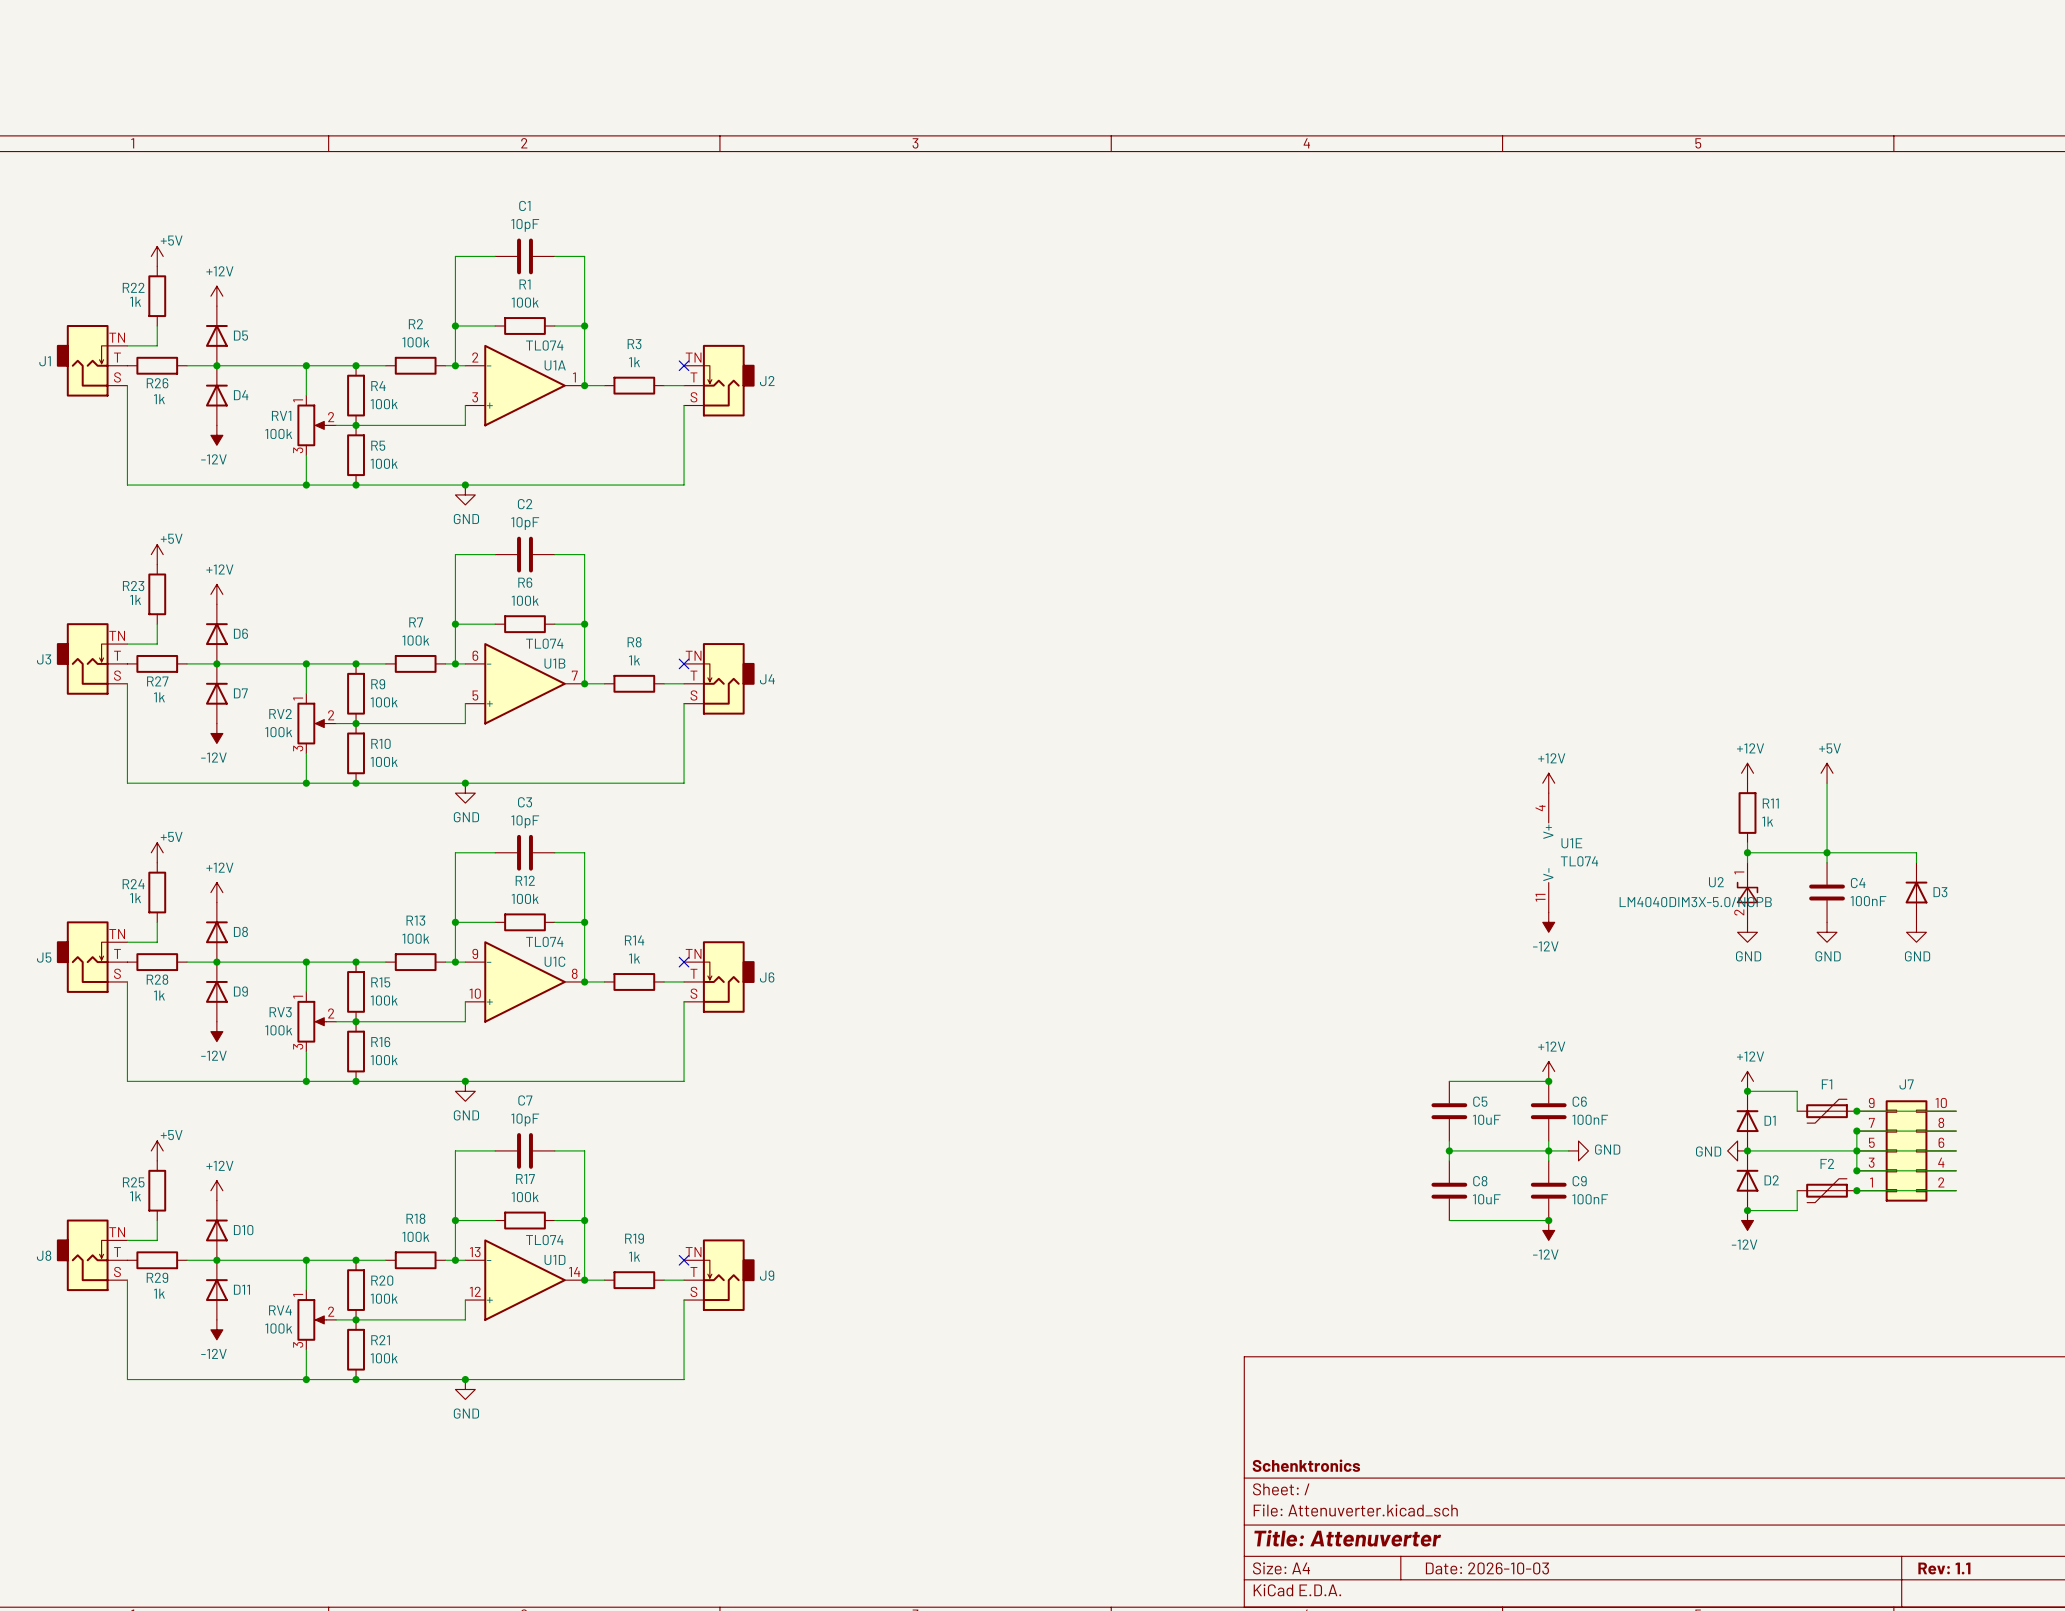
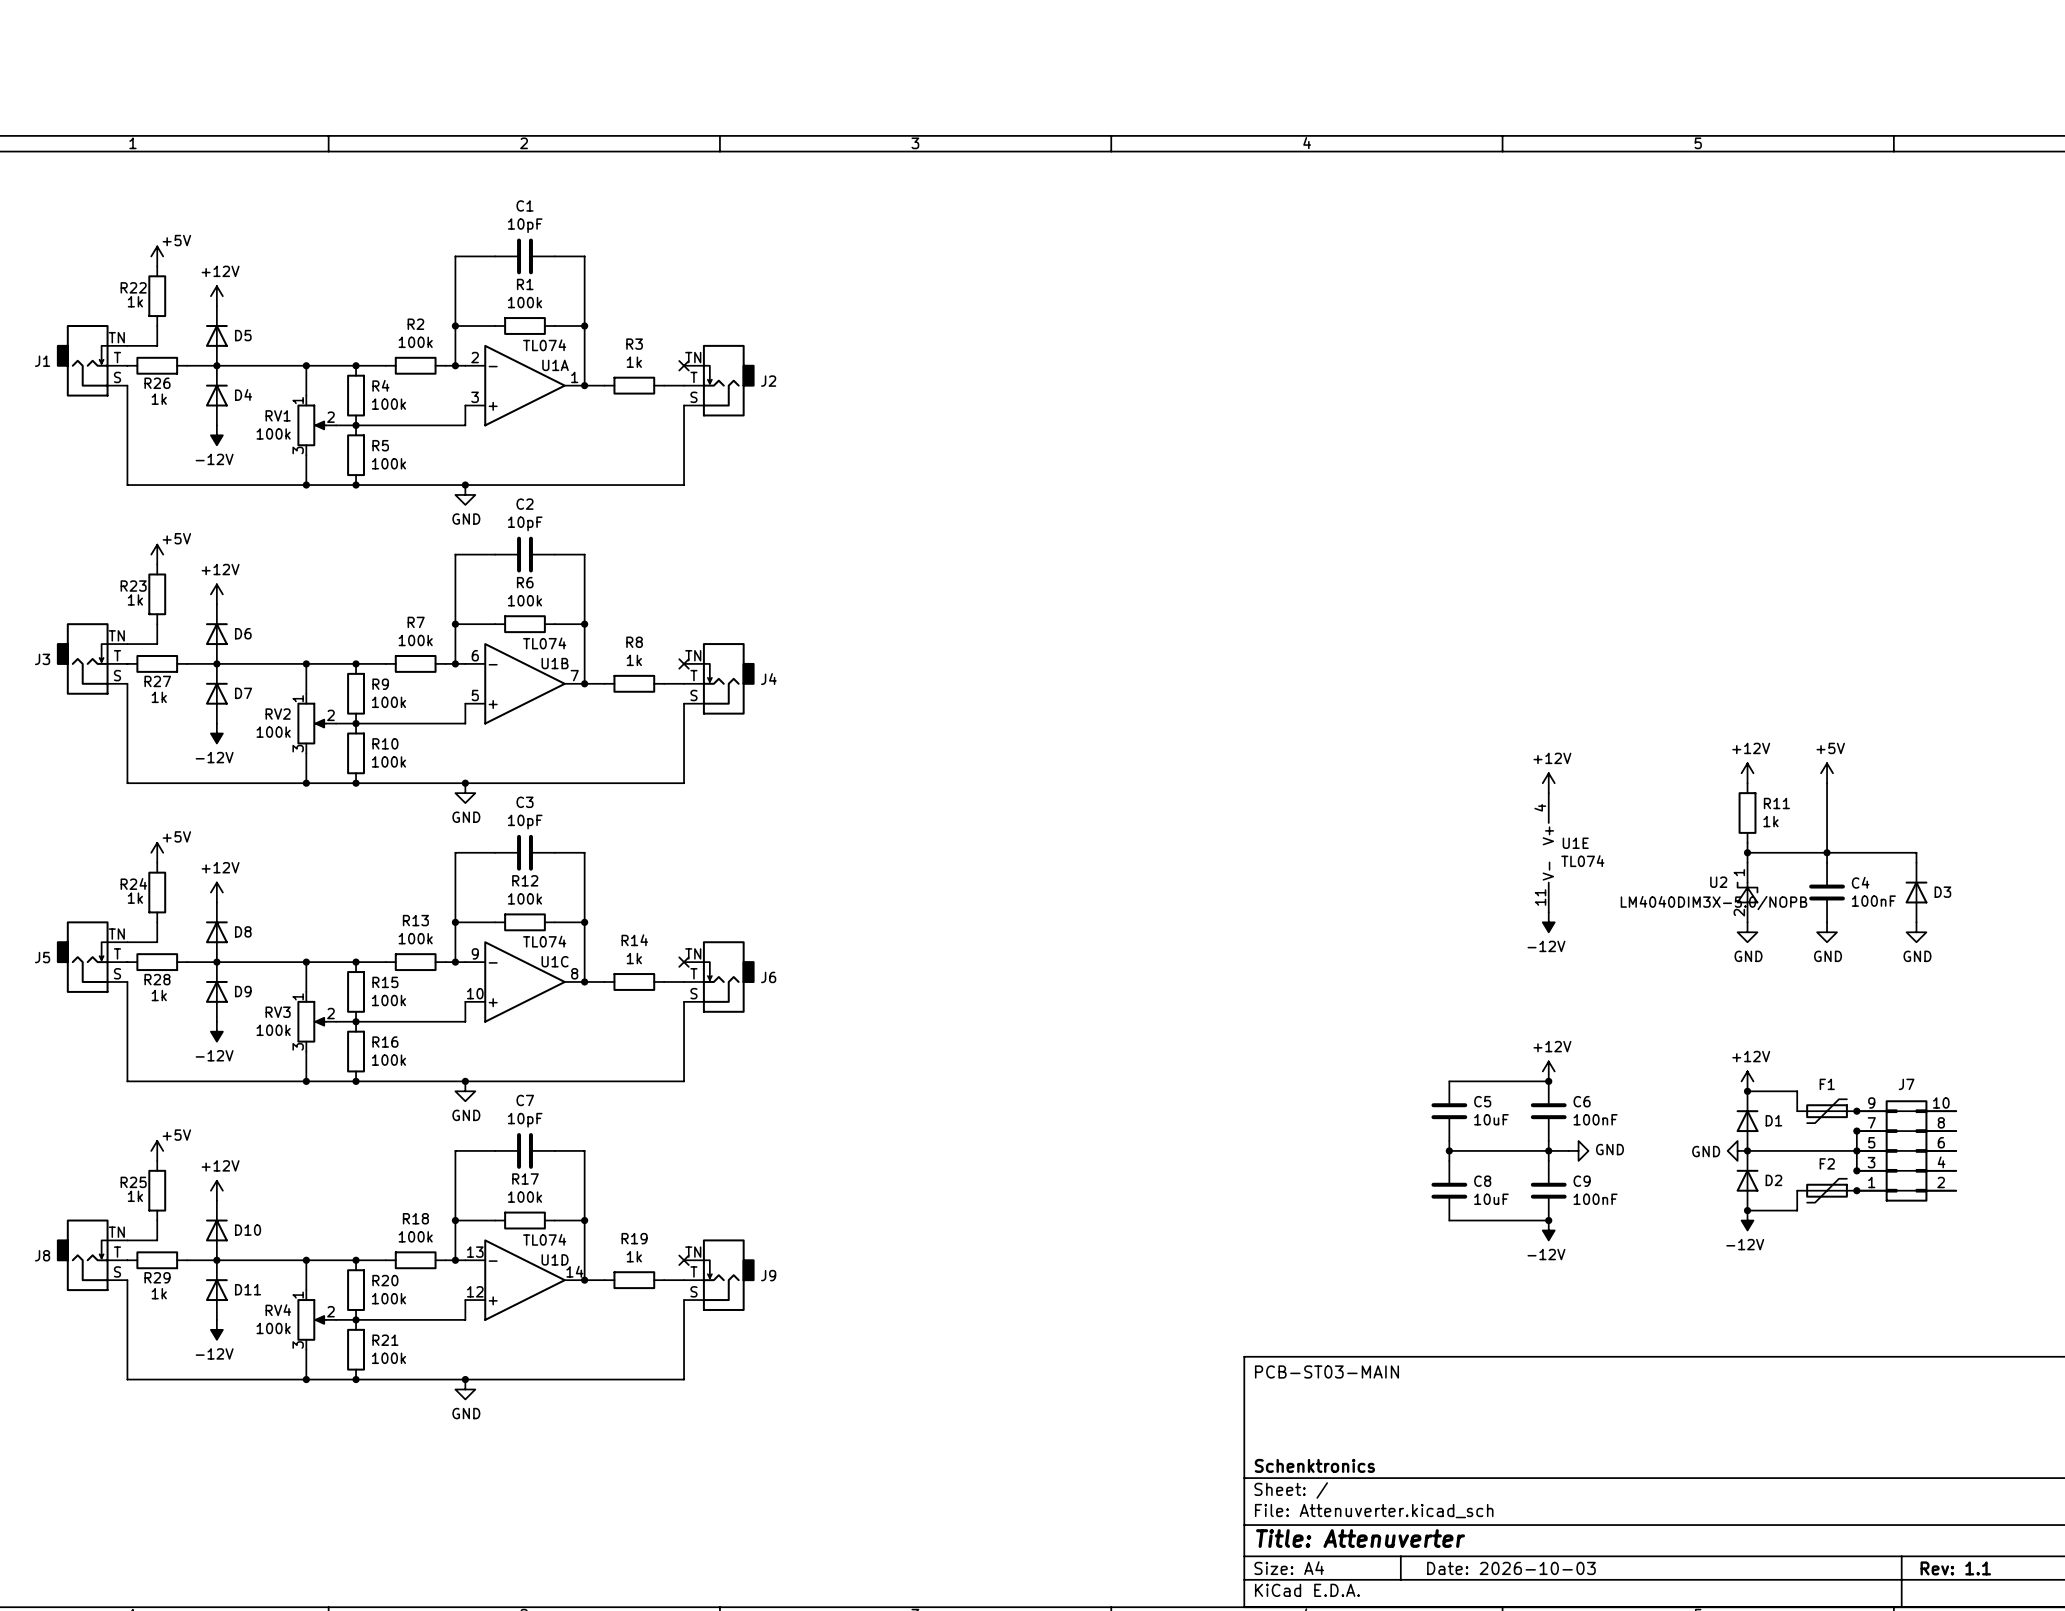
title block: none -> PCB-ST03-MAIN (1326, 1371)

